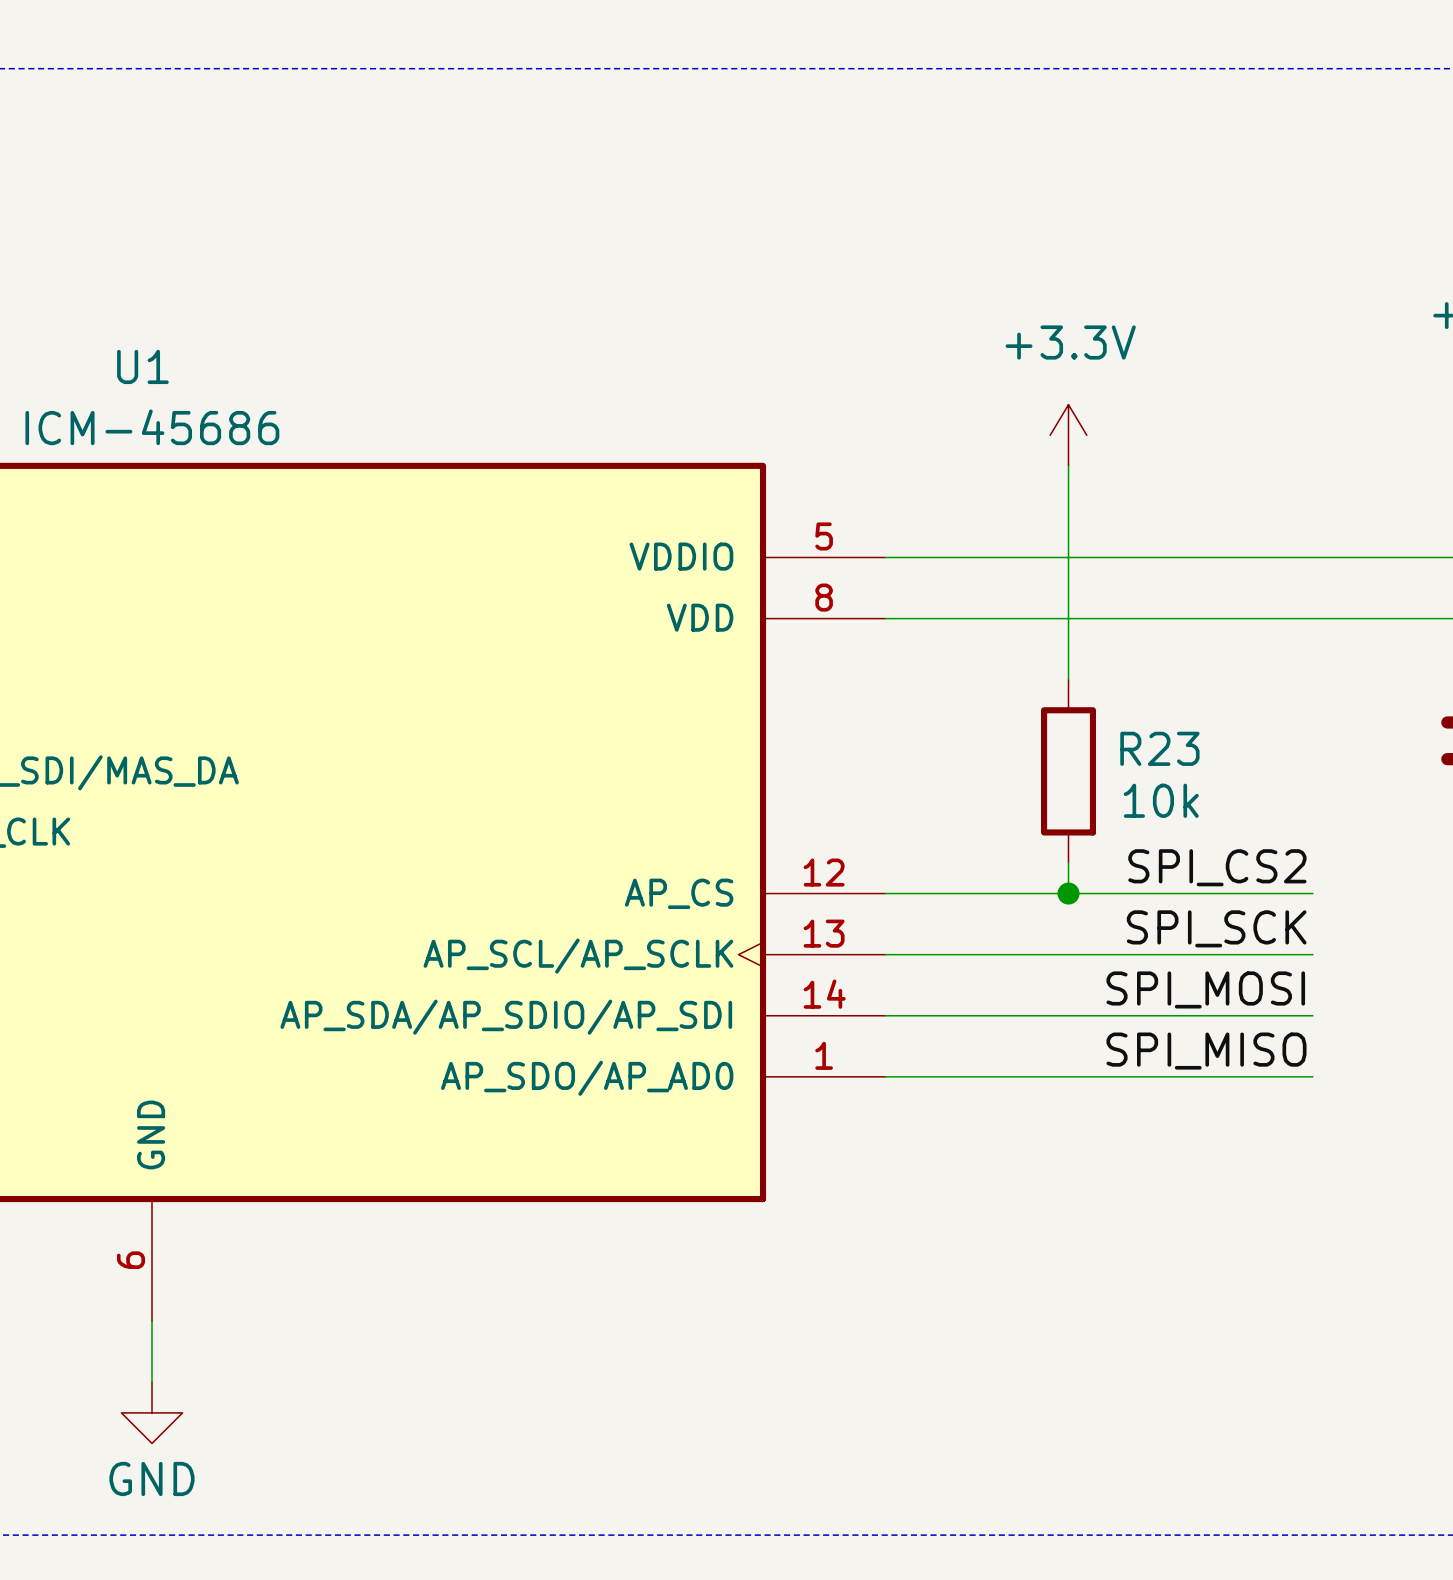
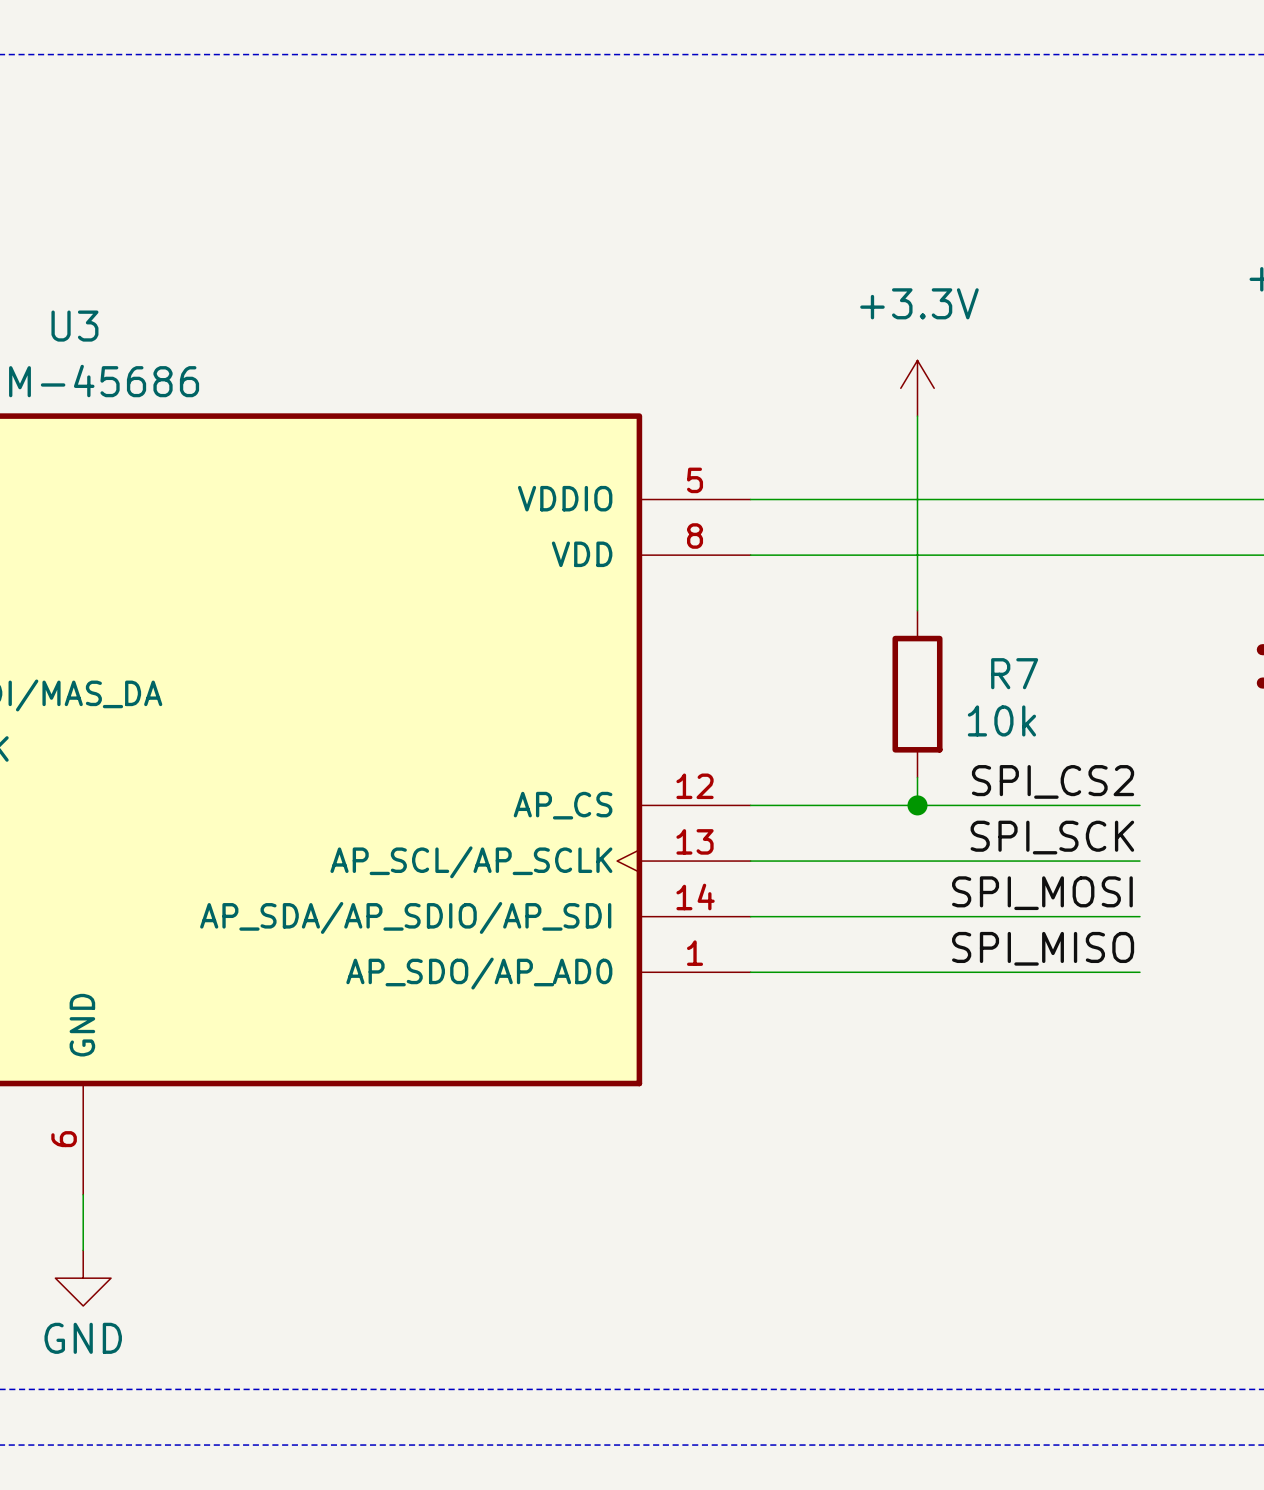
U1 name: U1 (142, 366) -> U3 (74, 326)
R23 name: R23 (1159, 748) -> R7 (1014, 673)

